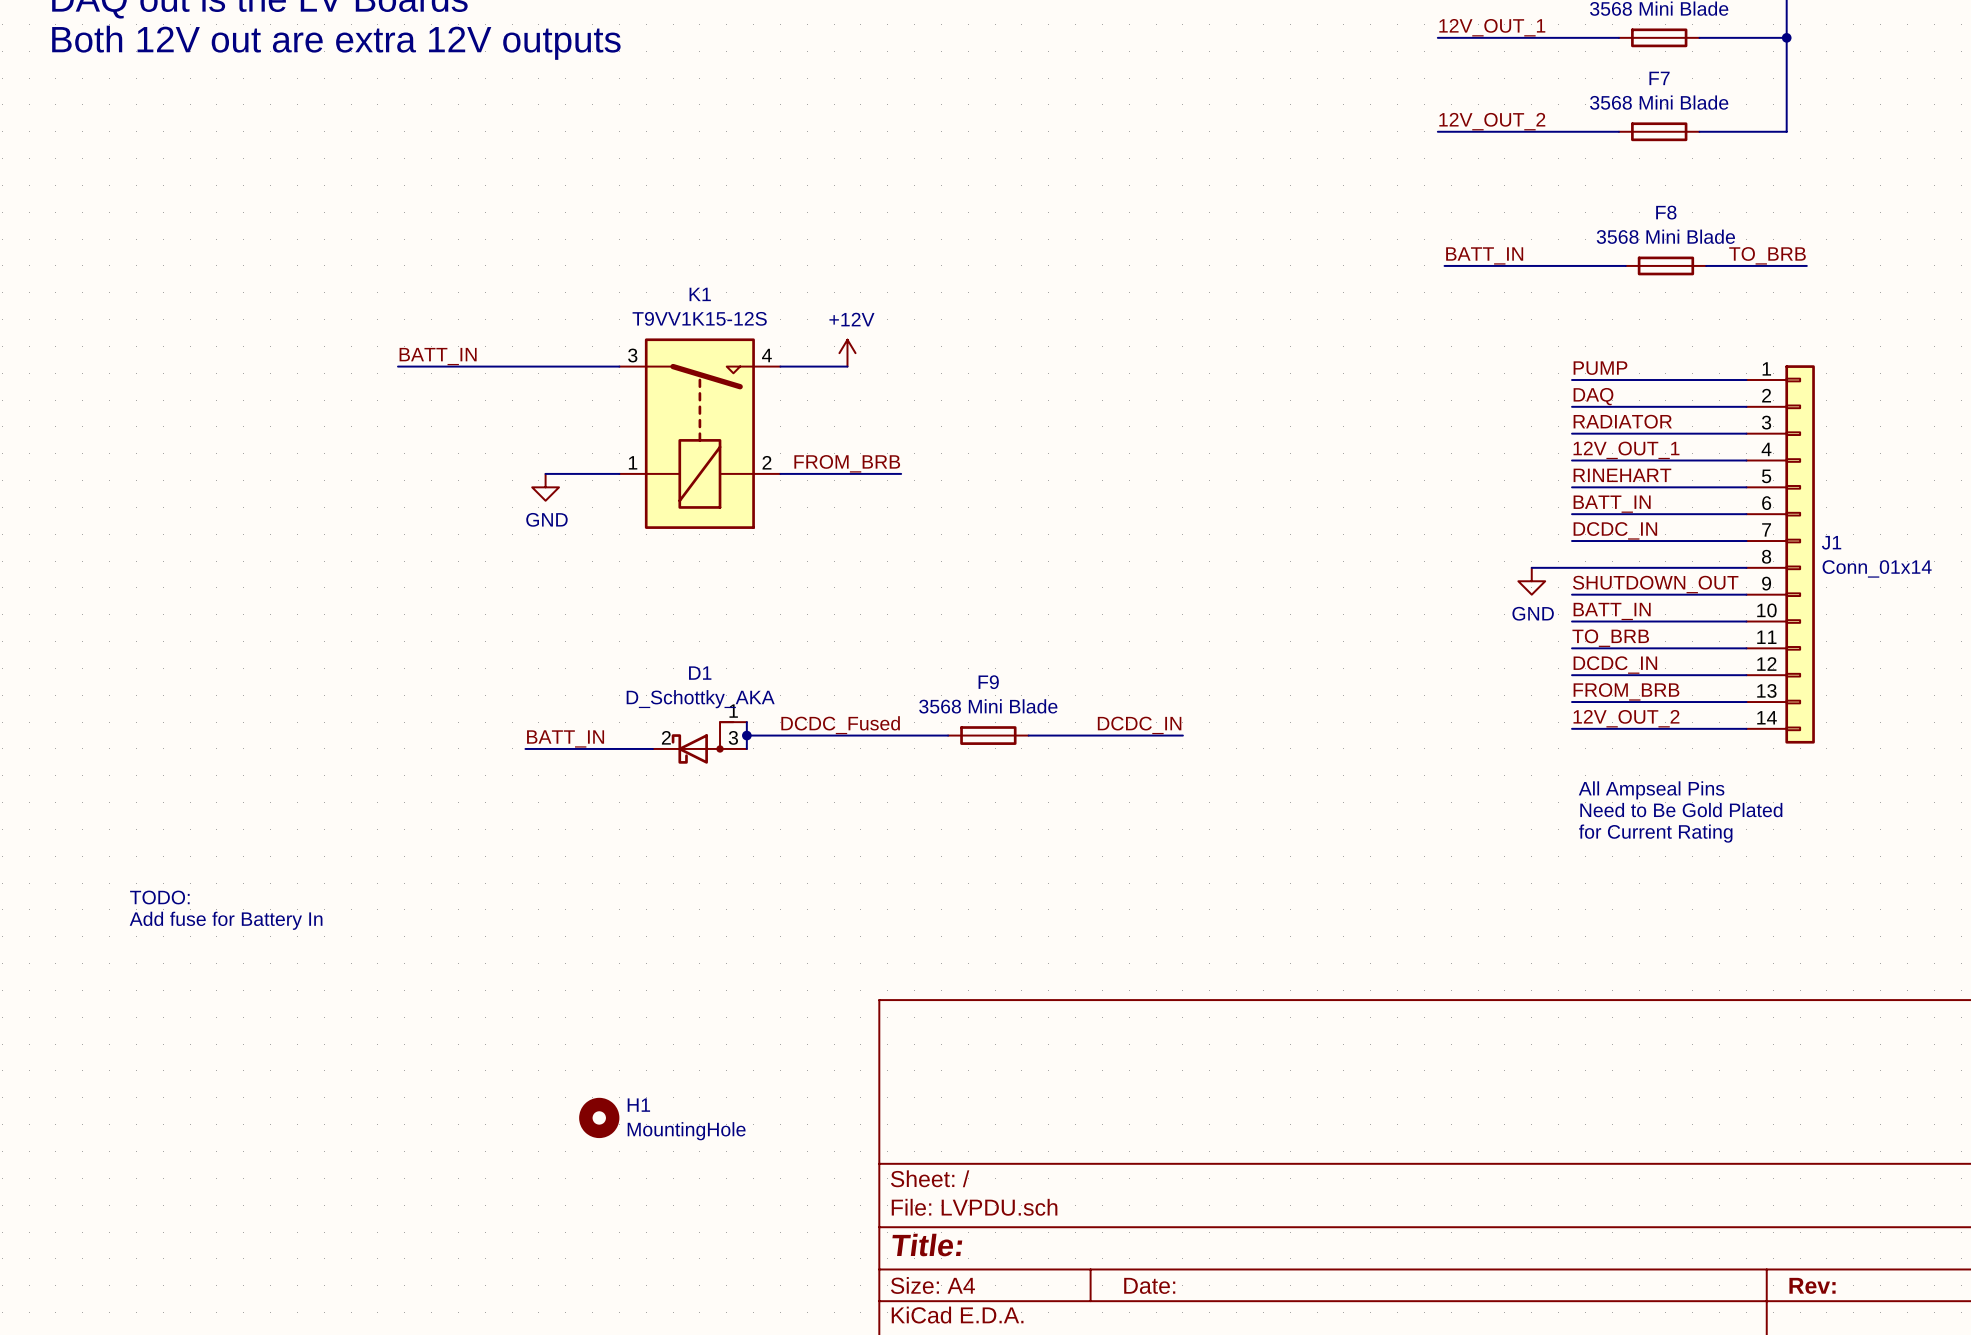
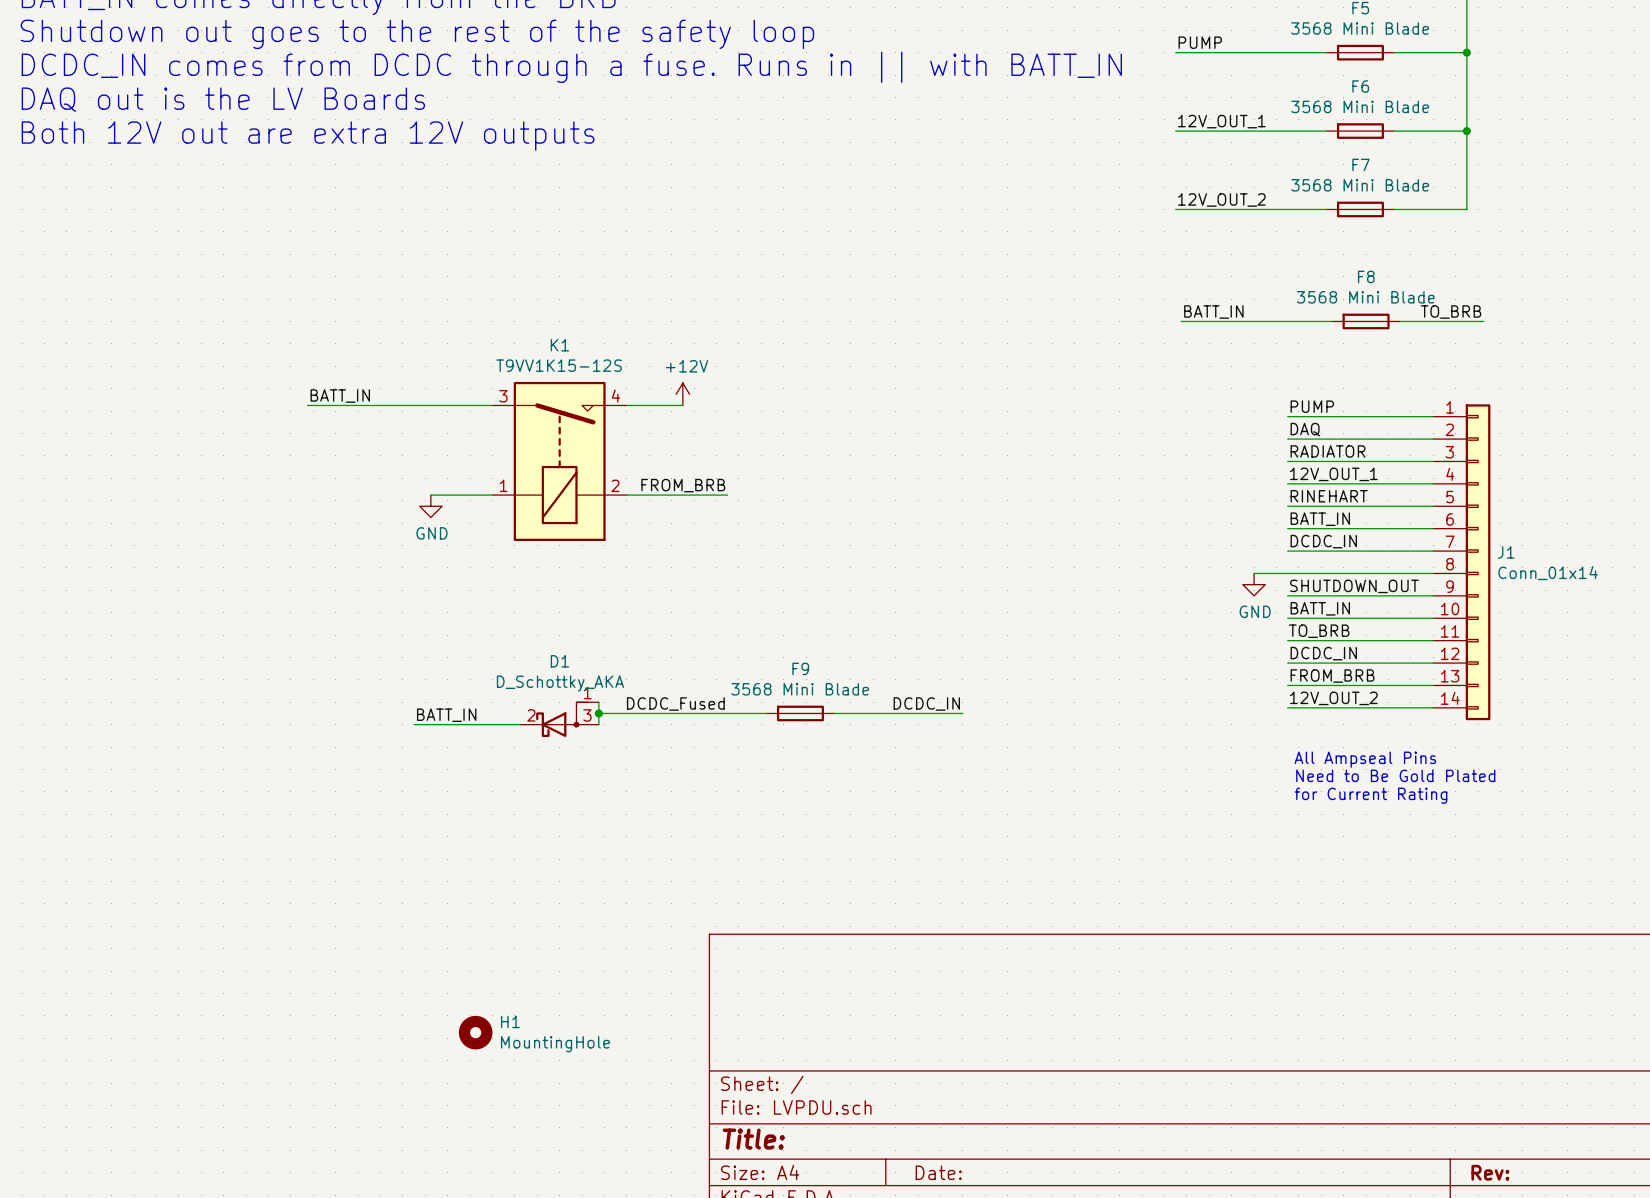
text: TODO: (159, 897) -> none
text: Add fuse for Battery In (226, 920) -> none

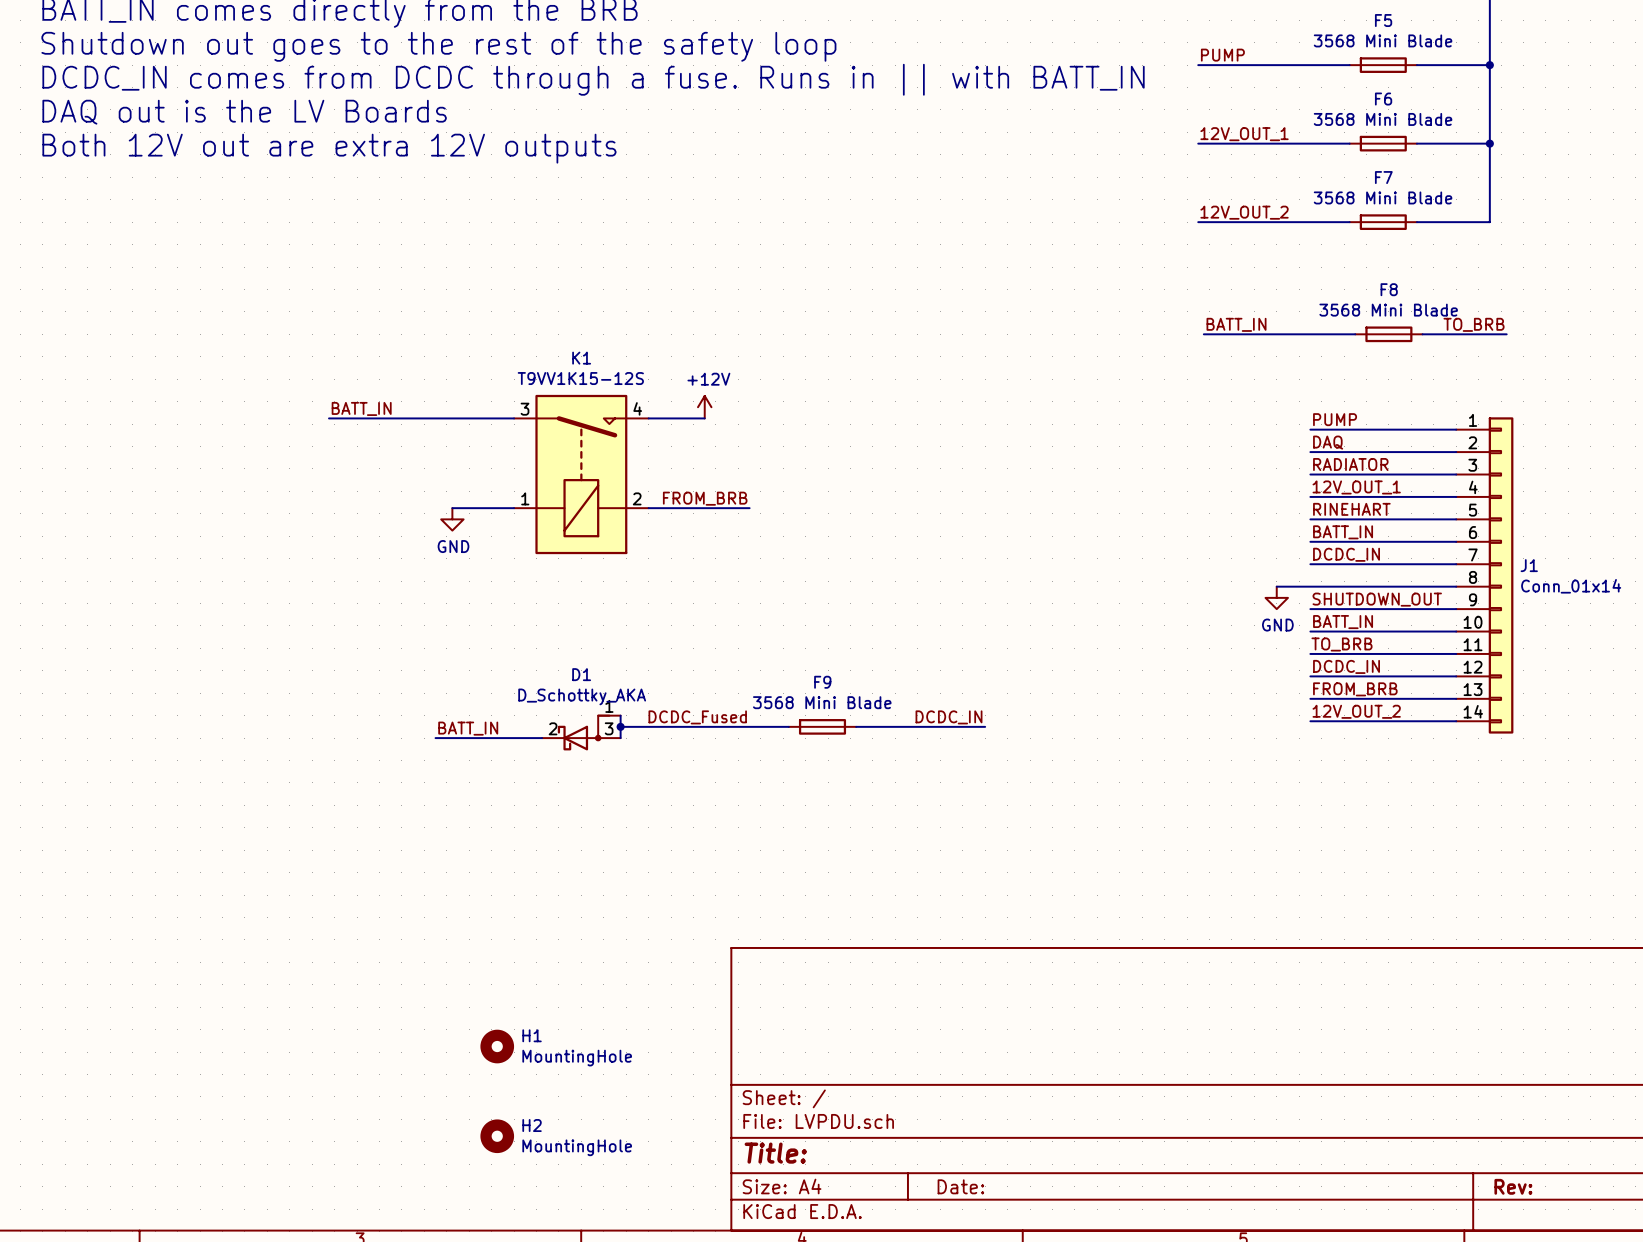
text: All Ampseal Pins (1365, 759) -> none
text: Need to Be Gold Plated (1395, 775) -> none
text: for Current Rating (1370, 795) -> none
H2: none -> MountingHole (497, 1136)

